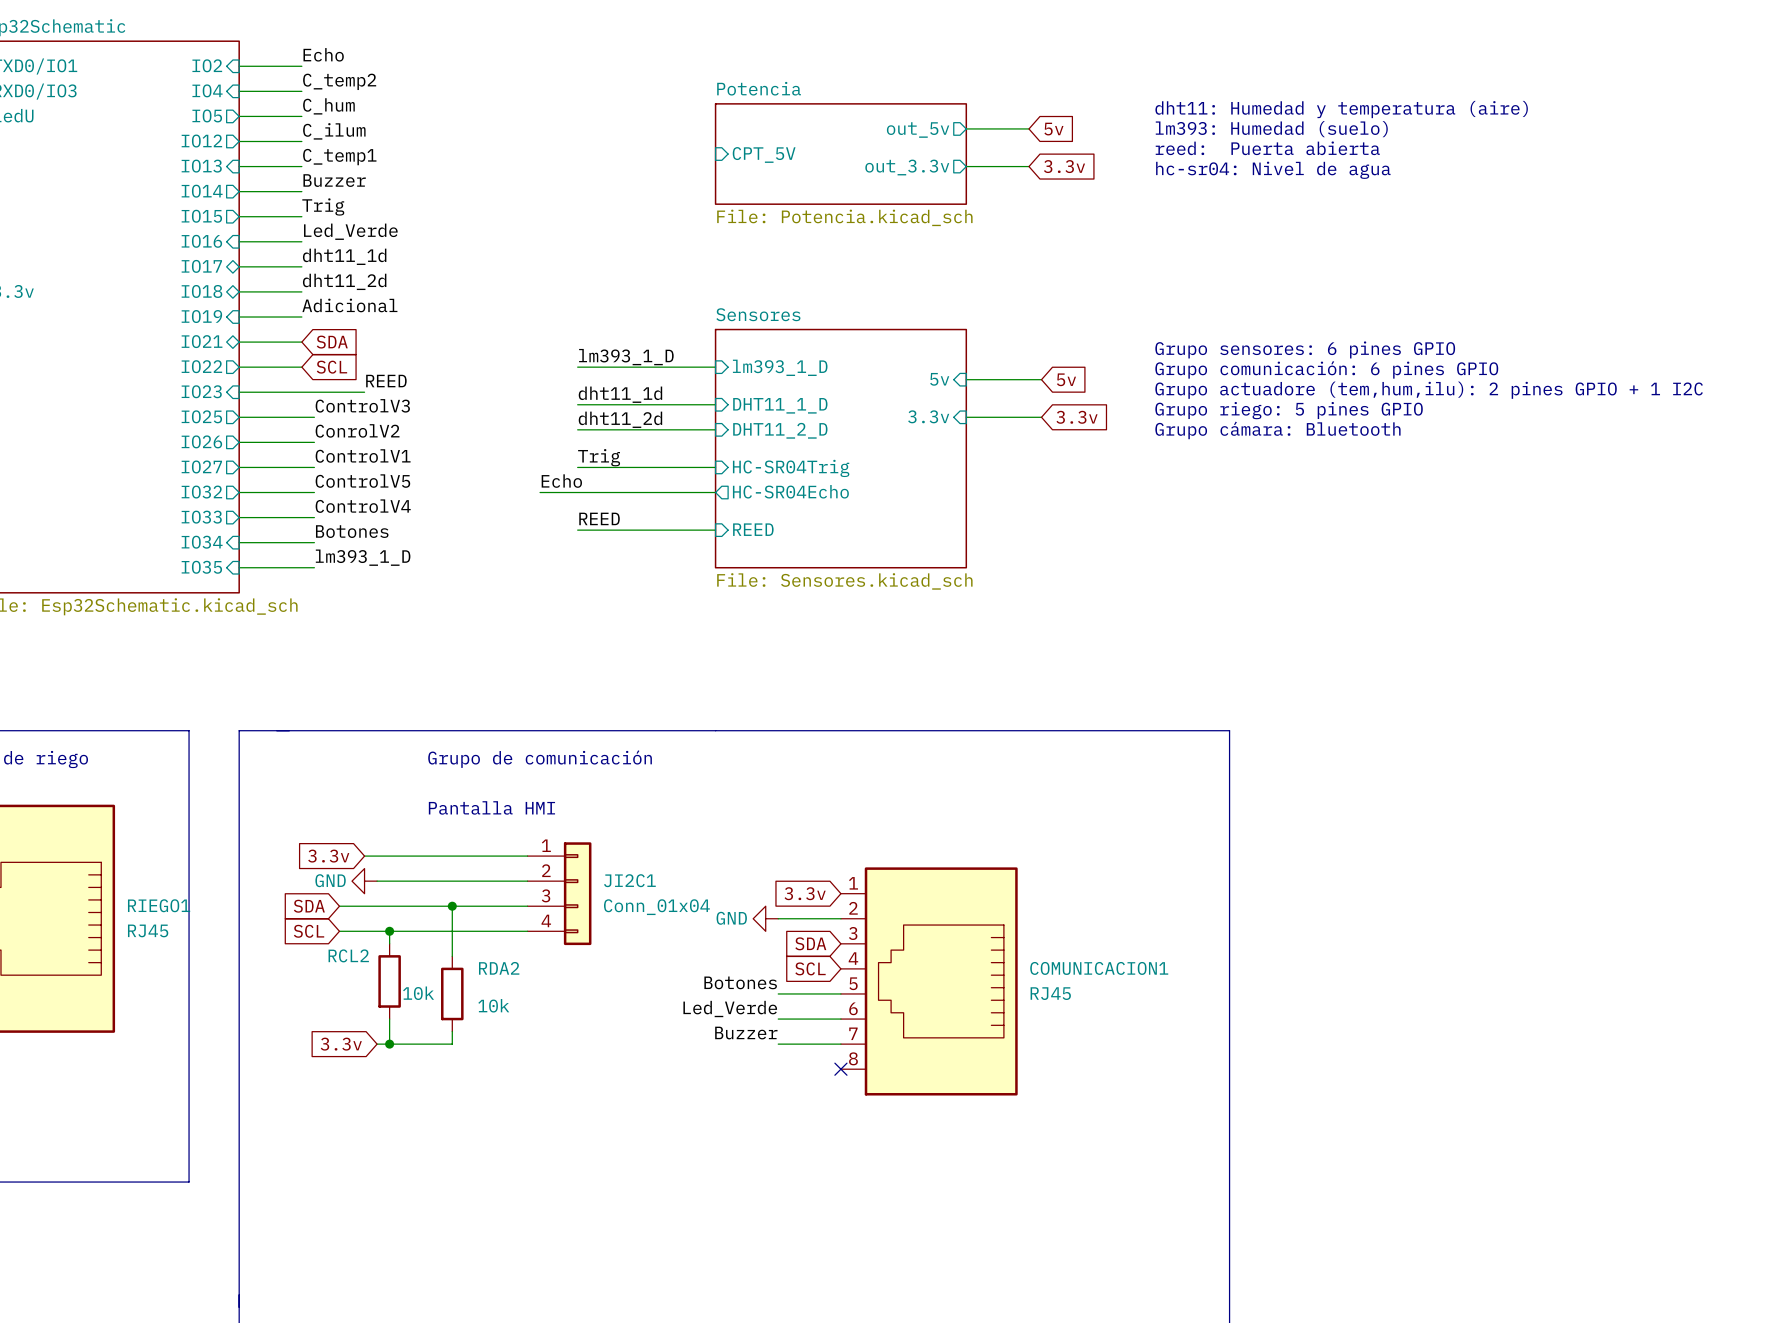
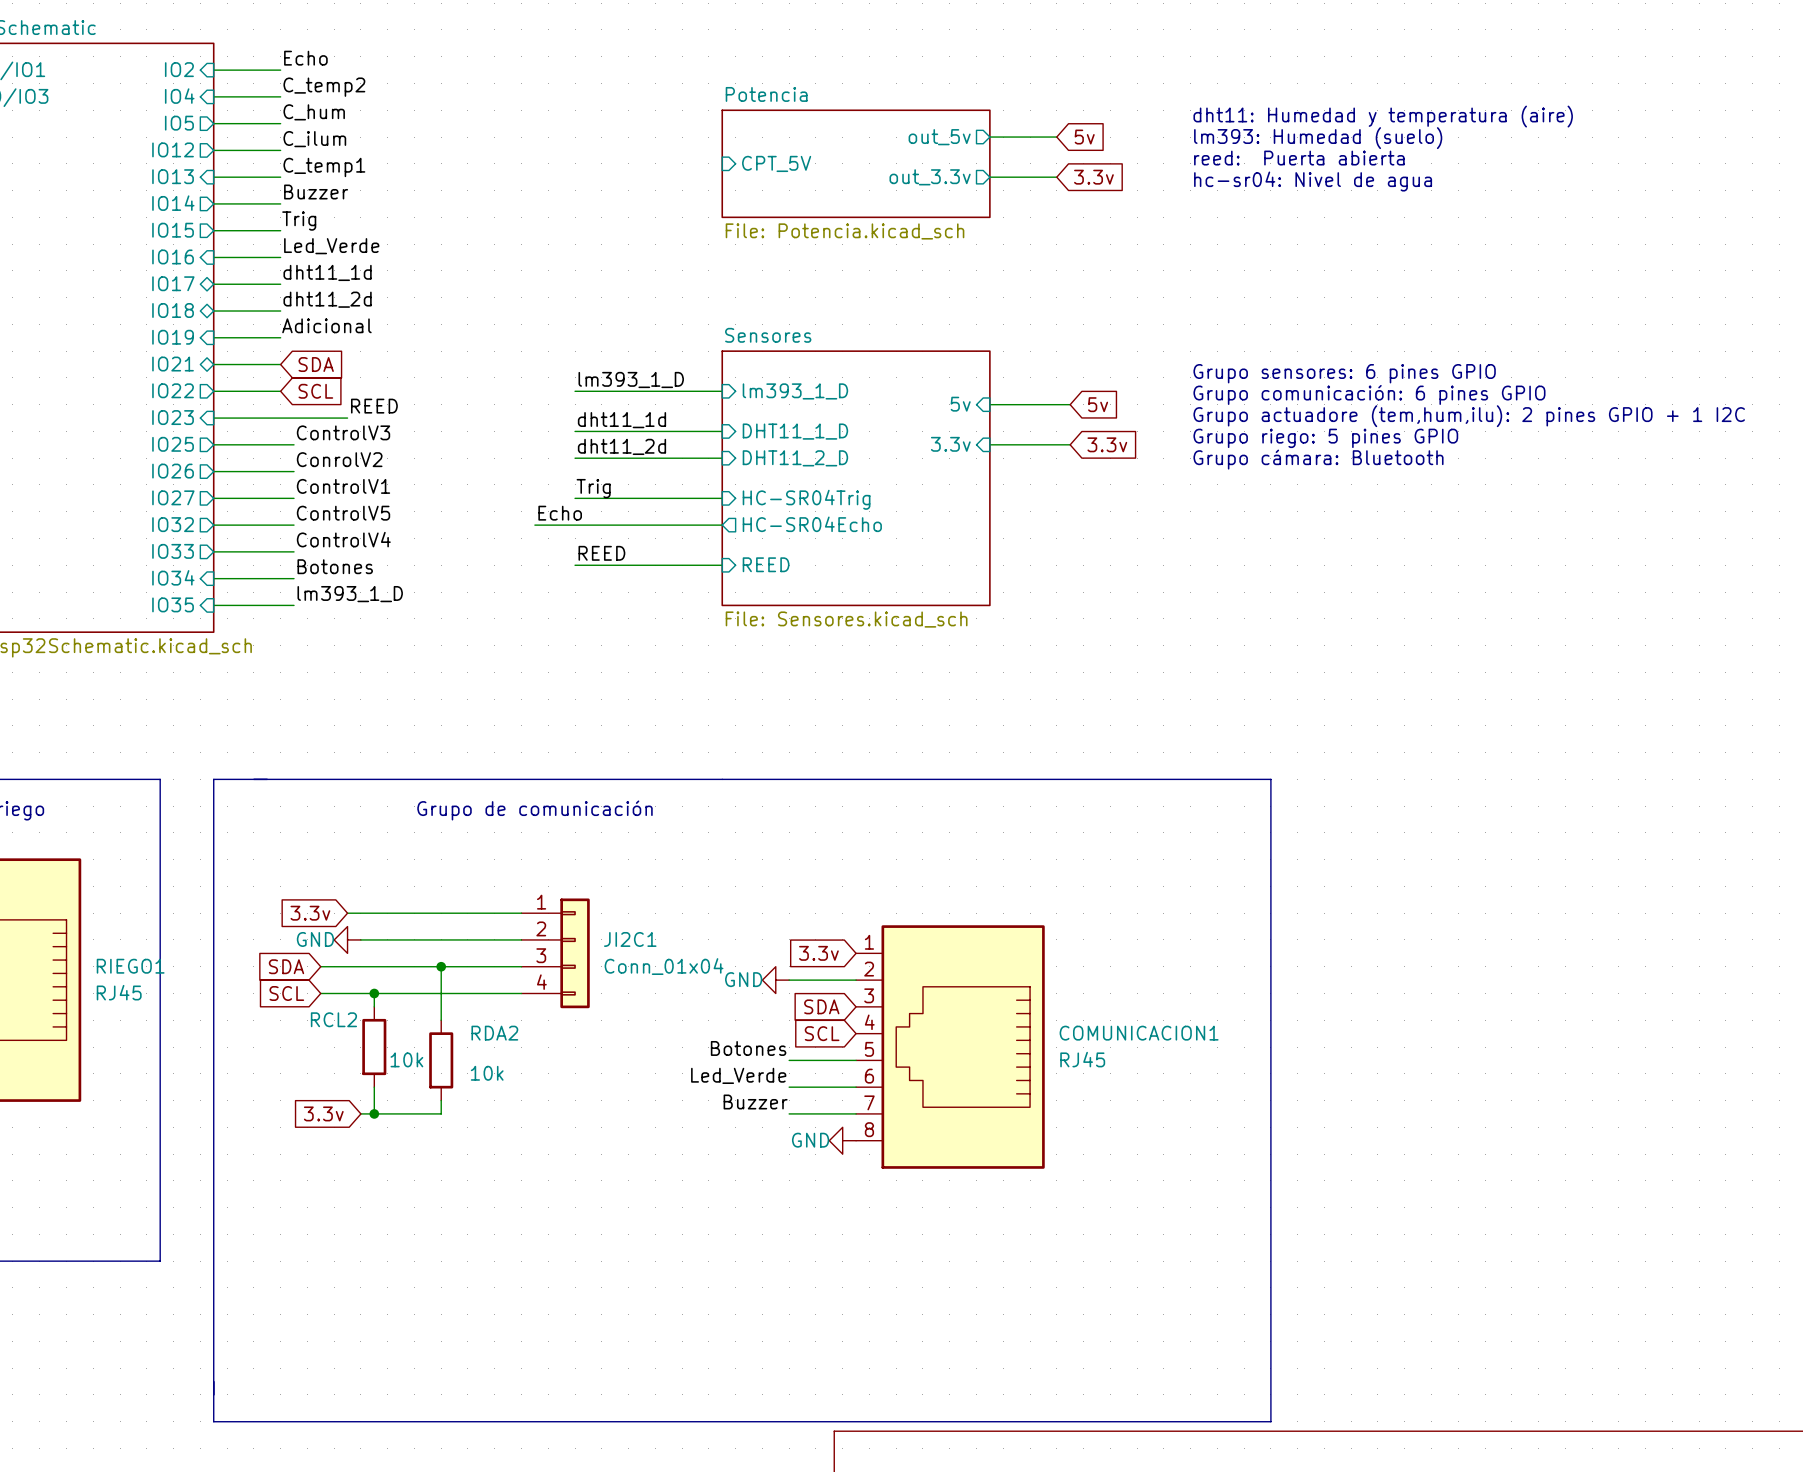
text: Pantalla HMI (491, 807) -> none
power symbol: none -> GND (842, 1140)
no-connect mark: (840, 1069) -> none

